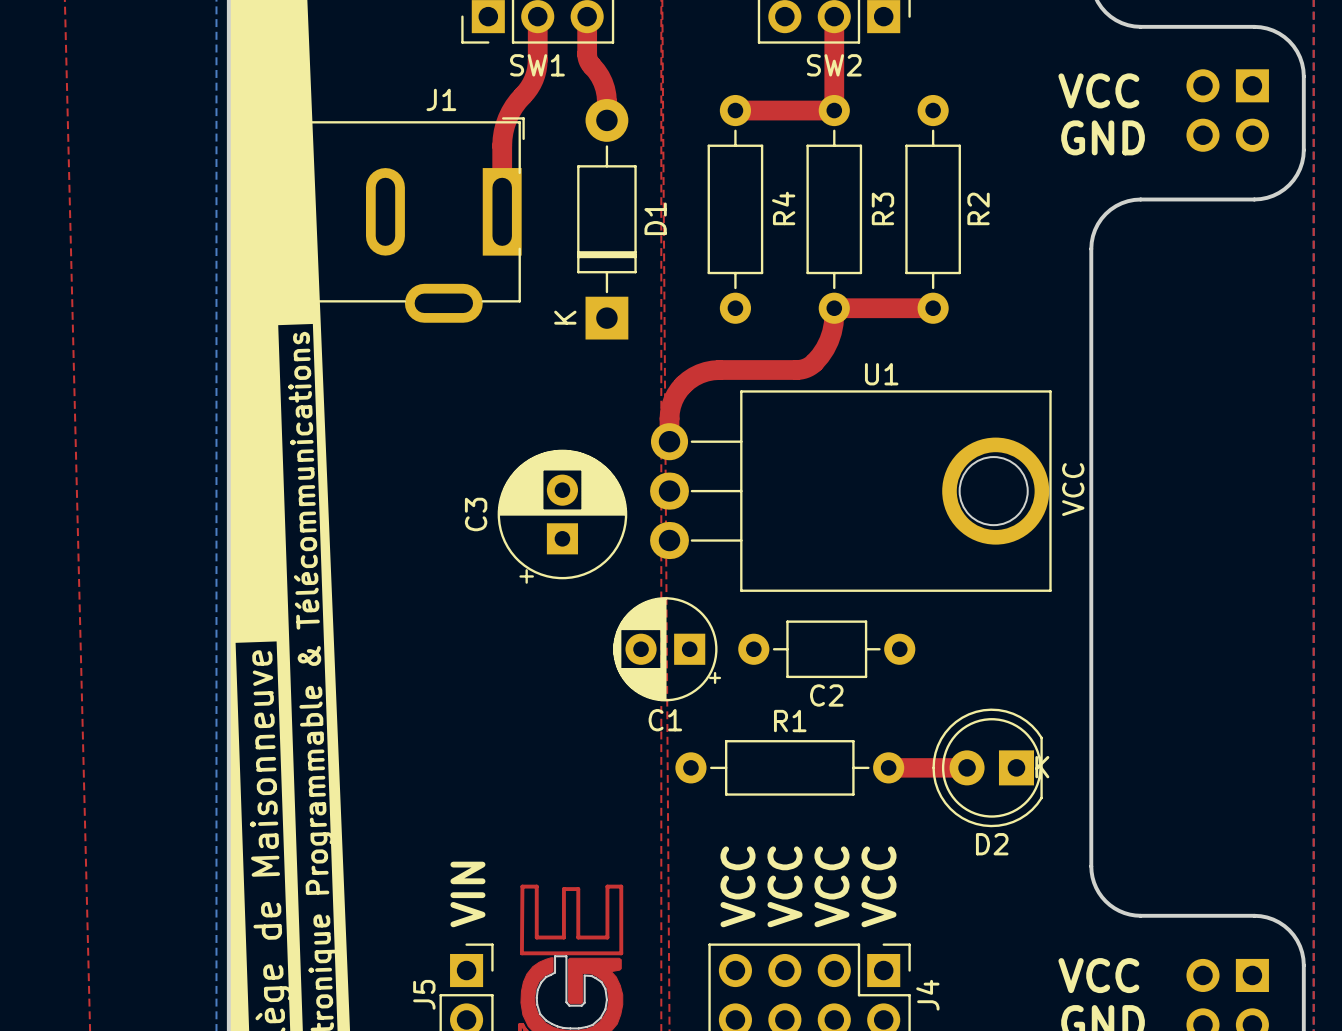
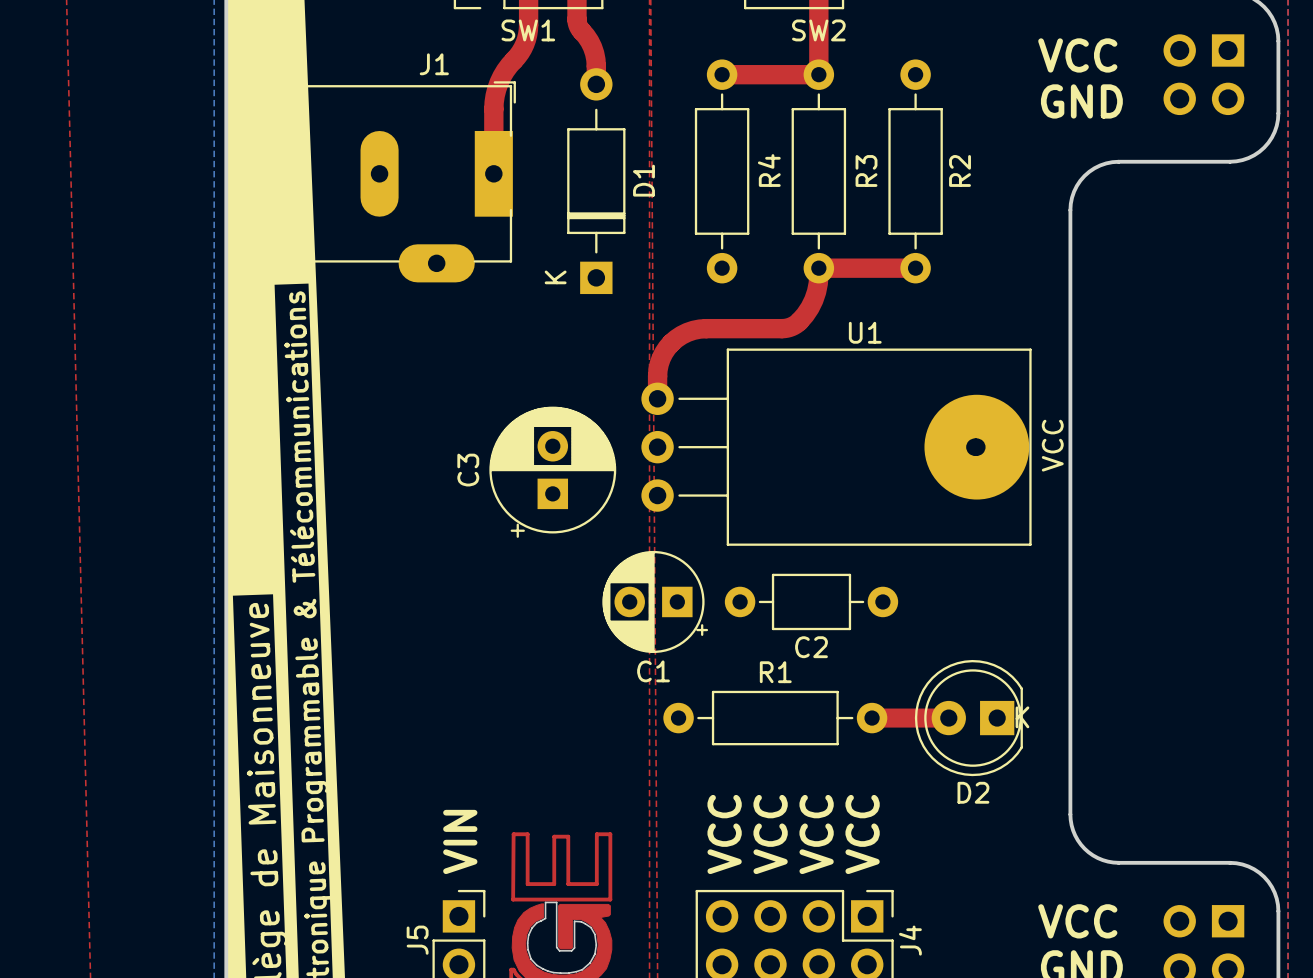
D1 footprint: [577, 99, 637, 340] -> [567, 68, 626, 295]
J1 footprint: [232, 117, 525, 323] -> [229, 81, 516, 283]
U1 footprint: [650, 390, 1052, 592] -> [641, 348, 1032, 546]

